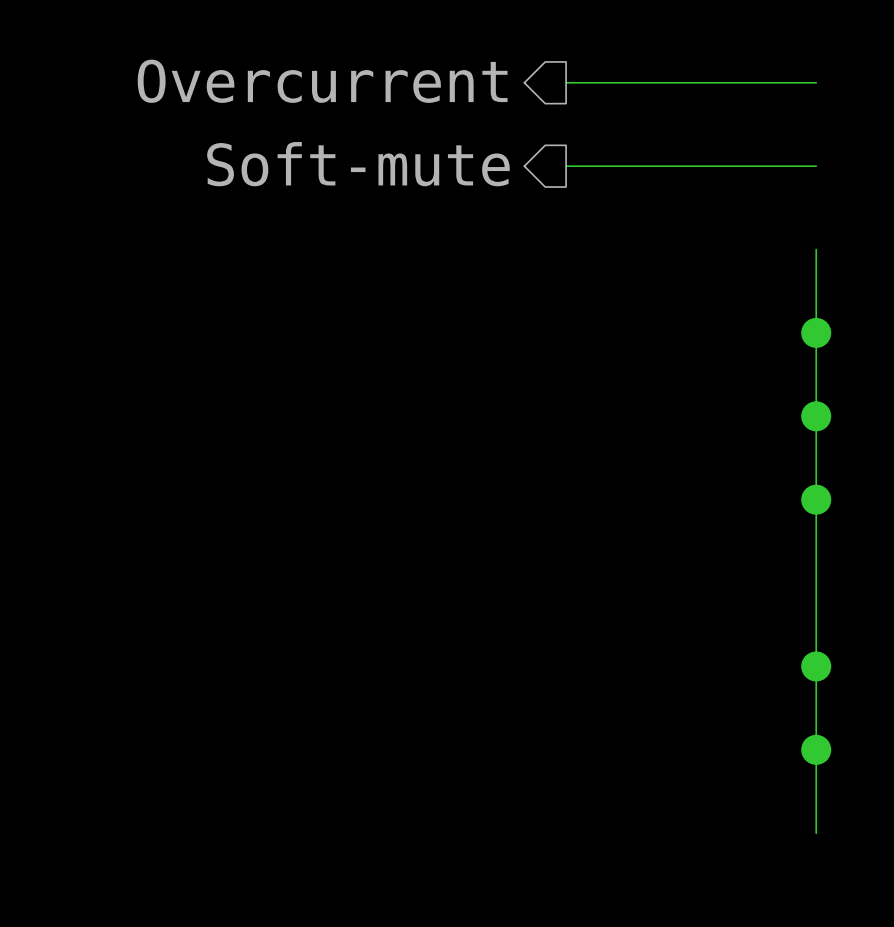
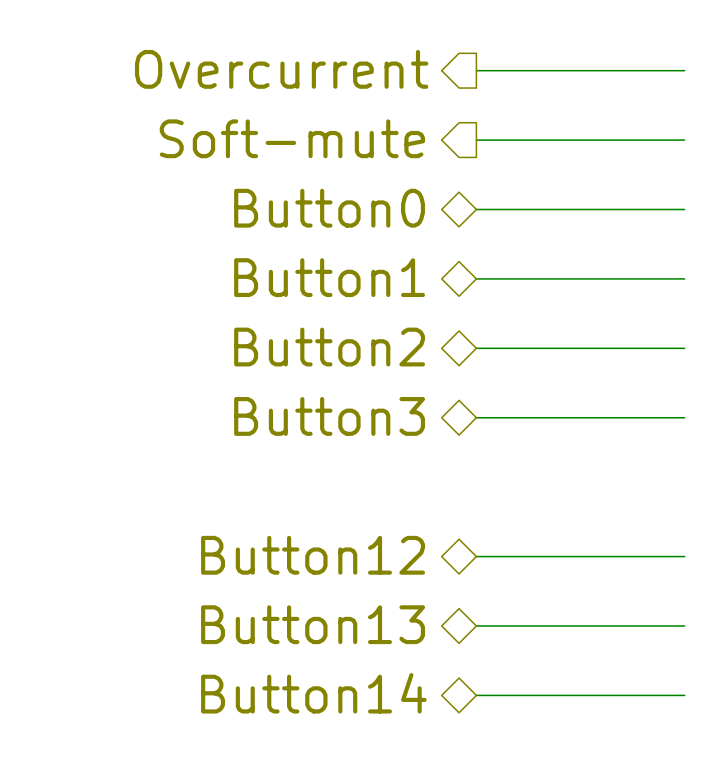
hierarchical label: none -> Button0 (329, 208)
wire: (816, 249) (816, 833) -> (684, 209) (476, 209)
hierarchical label: none -> Button1 (329, 277)
wire: none -> (476, 278) (684, 278)
junction: (816, 332) -> none
hierarchical label: none -> Button2 (329, 347)
wire: none -> (476, 348) (684, 348)
junction: (816, 416) -> none
hierarchical label: none -> Button3 (329, 416)
wire: none -> (476, 417) (684, 417)
junction: (816, 499) -> none
hierarchical label: none -> Button12 (313, 555)
wire: none -> (476, 556) (684, 556)
junction: (816, 666) -> none
hierarchical label: none -> Button13 (313, 624)
wire: none -> (476, 626) (684, 626)
junction: (816, 749) -> none
hierarchical label: none -> Button14 (313, 693)
wire: none -> (476, 695) (684, 695)

